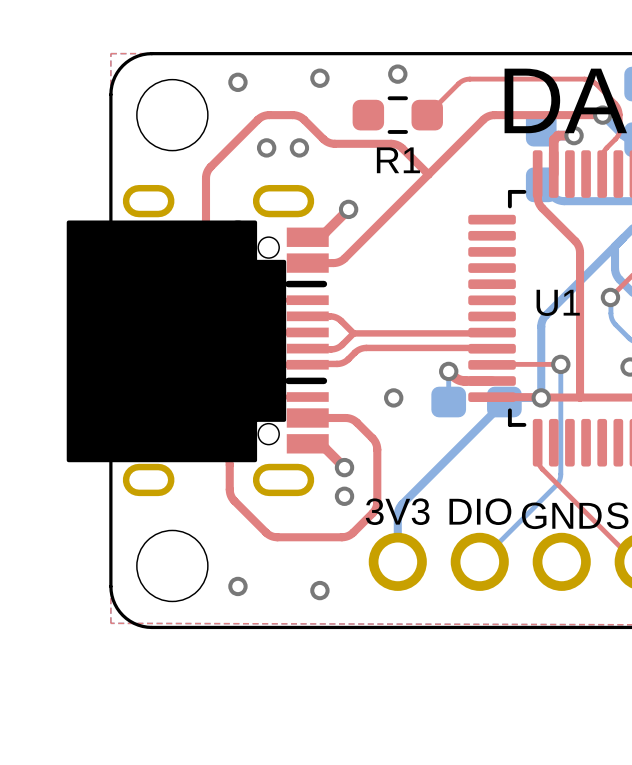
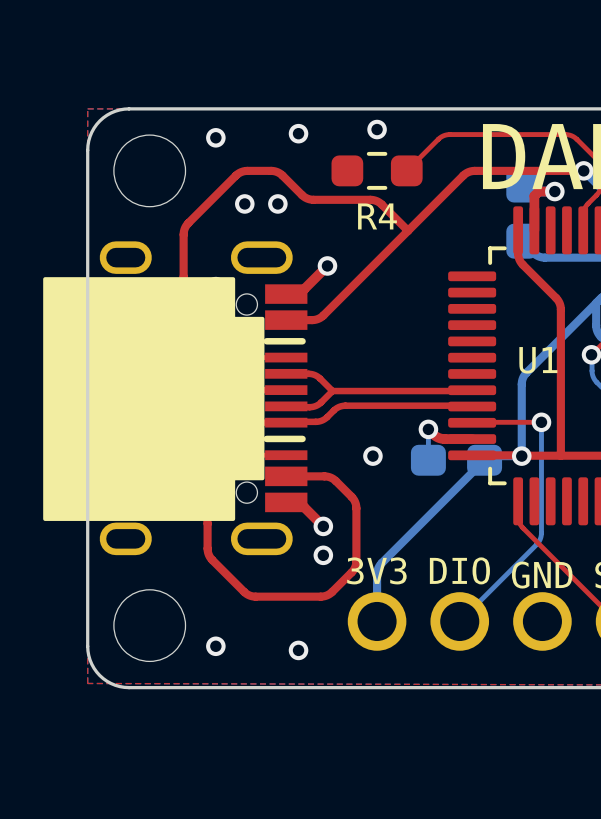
R1 name: R1 (398, 160) -> R4 (377, 216)

